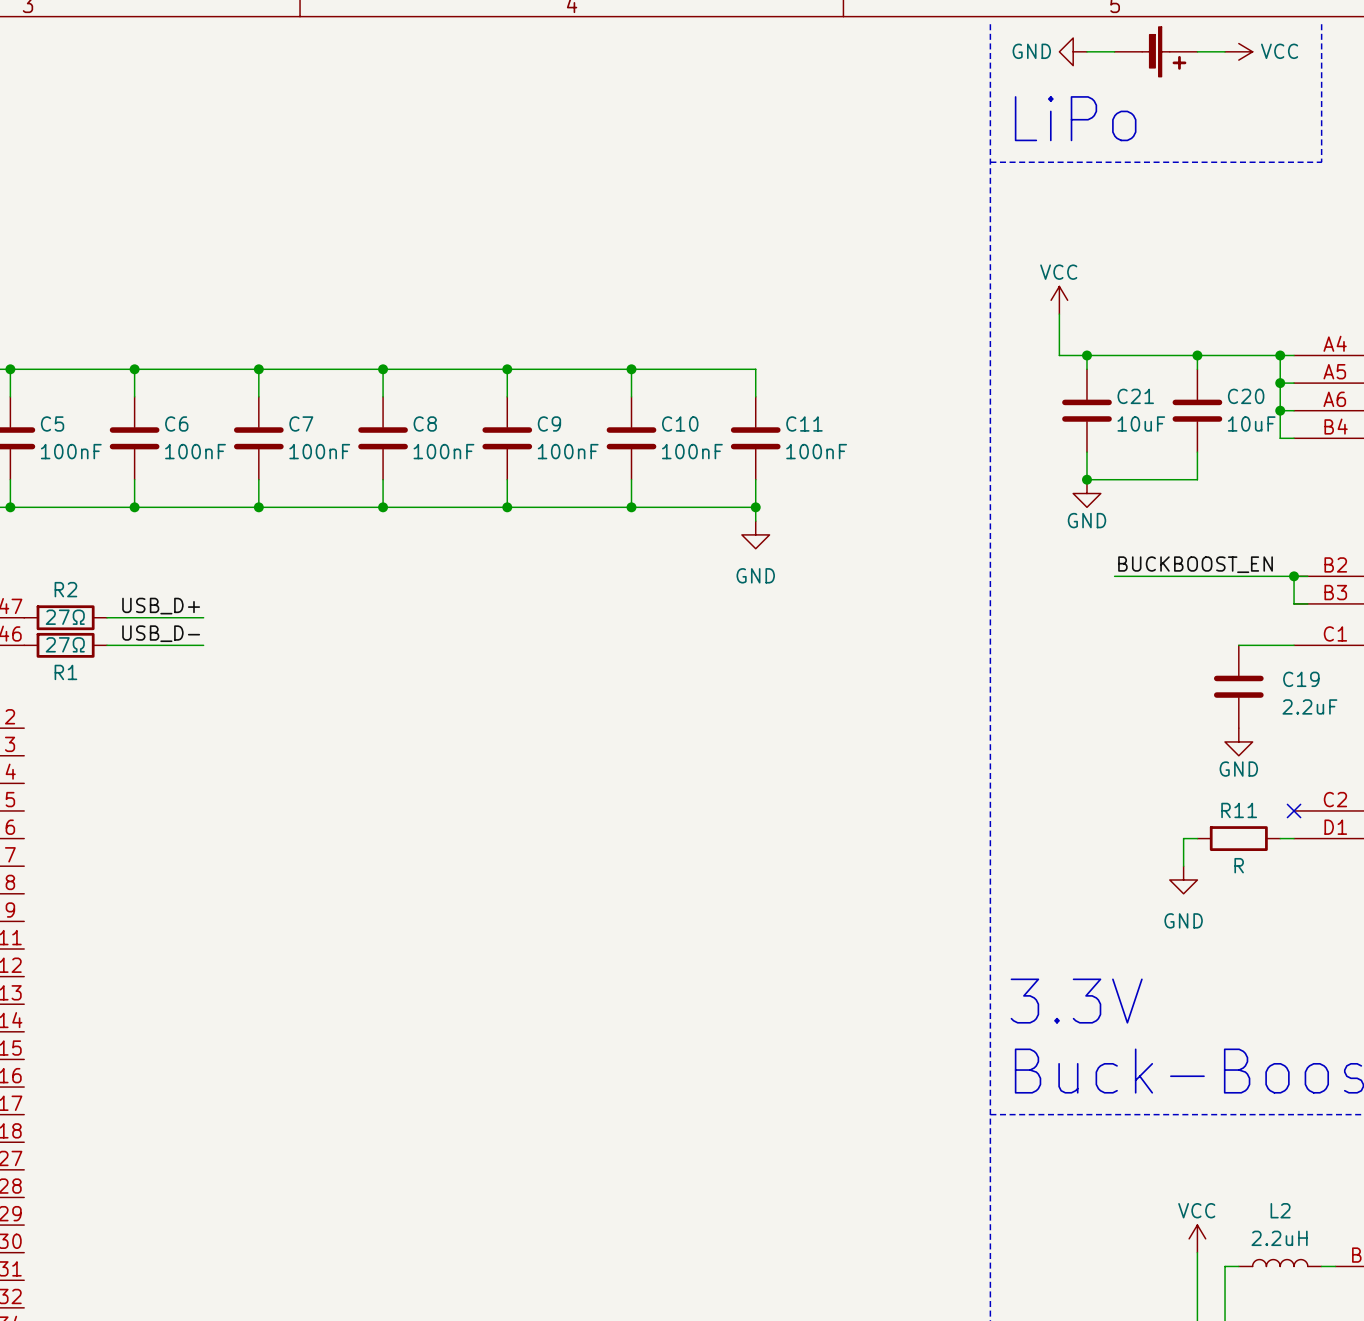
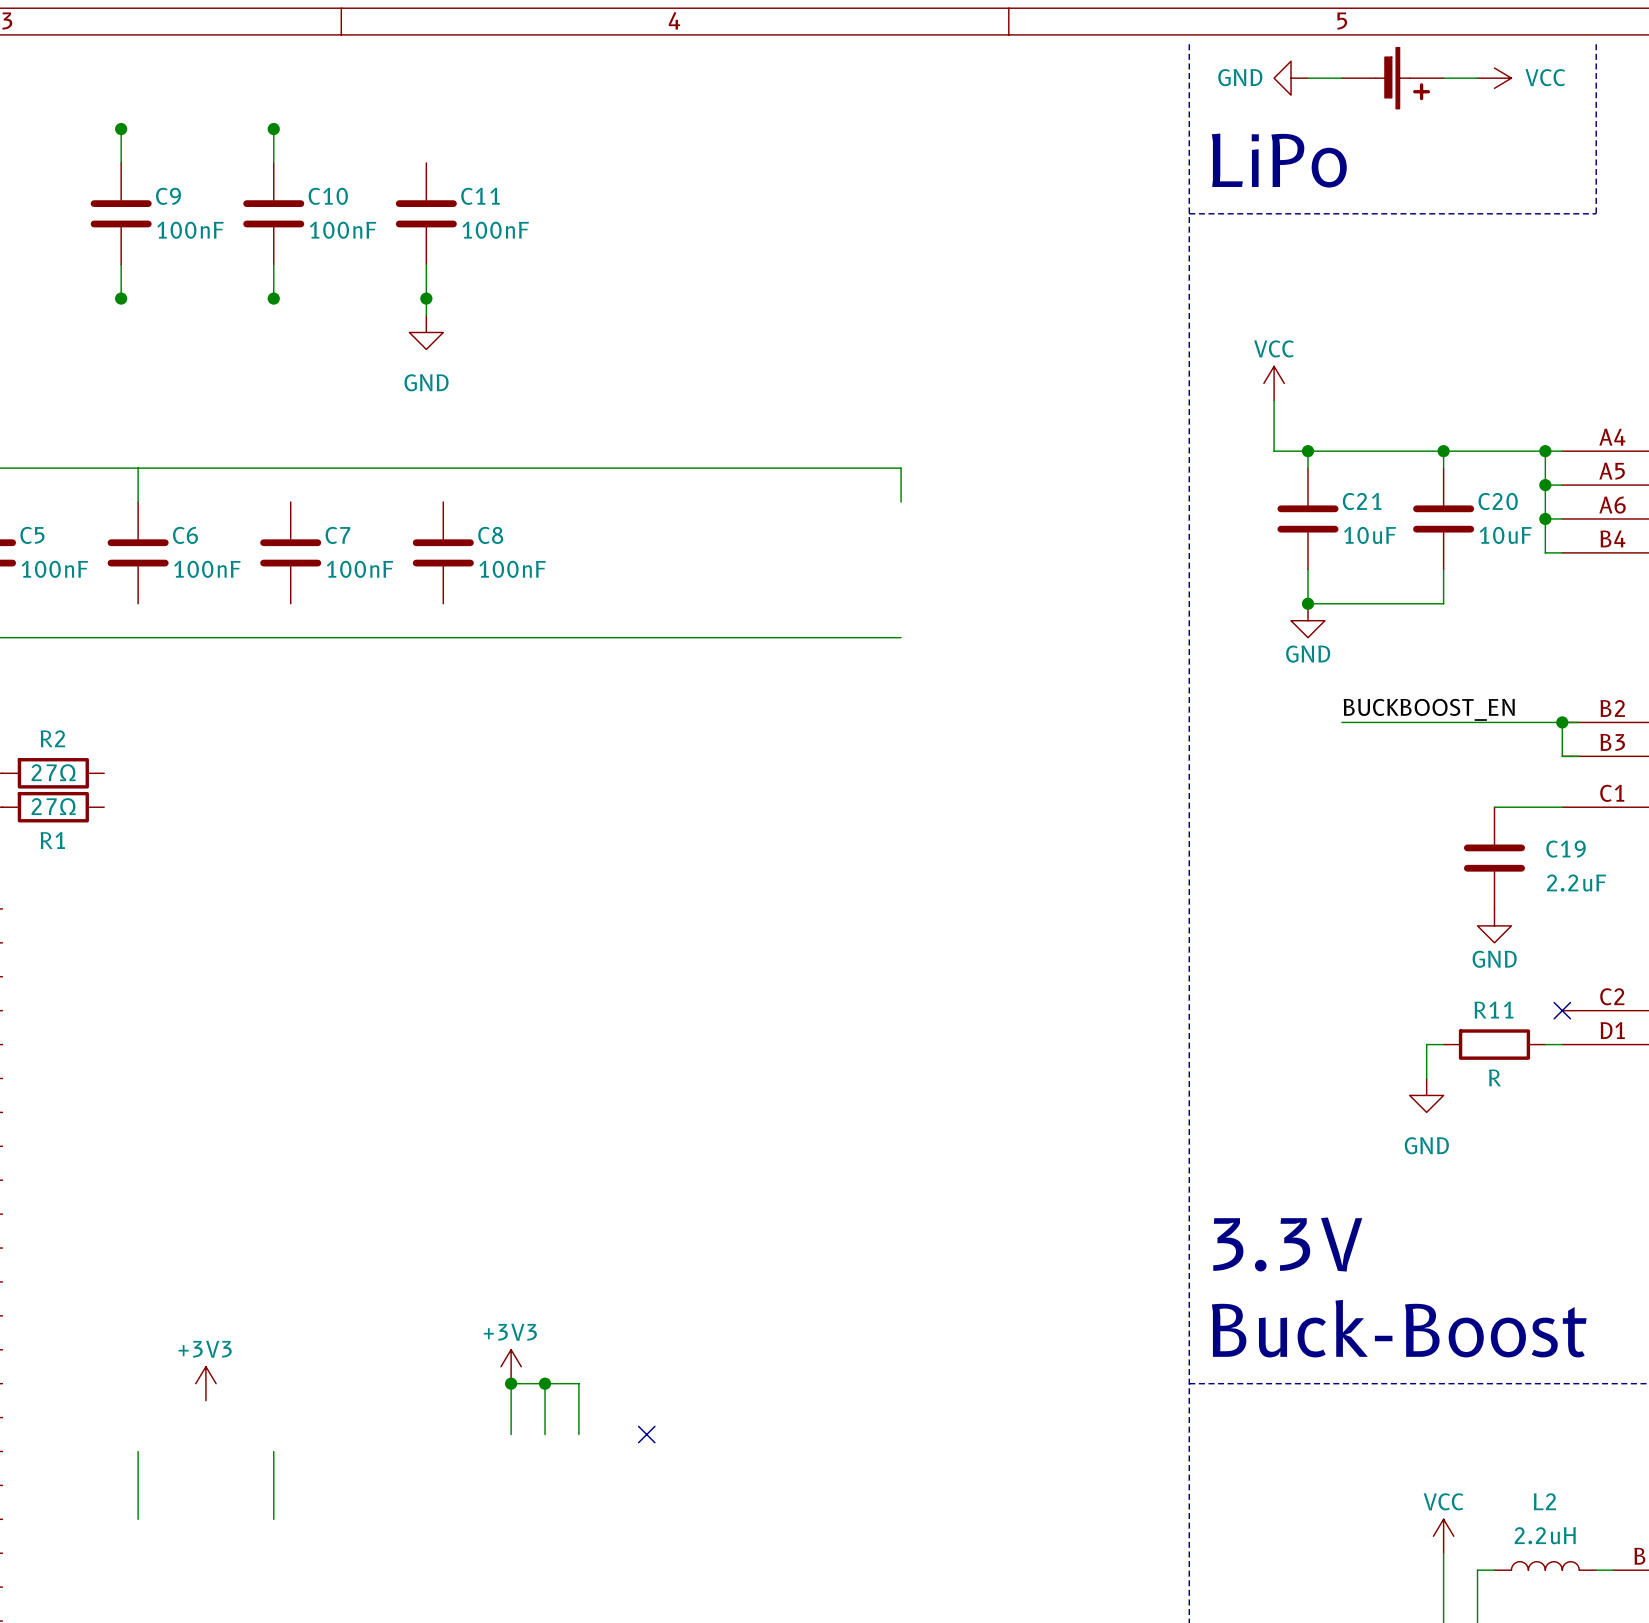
wire: none -> (121, 129) (121, 162)
junction: none -> (121, 129)
wire: none -> (273, 129) (273, 162)
junction: none -> (273, 129)
wire: none -> (426, 264) (426, 315)
junction: none -> (121, 298)
junction: none -> (273, 298)
junction: none -> (426, 298)
power symbol: none -> GND (426, 332)
junction: (134, 369) -> none
wire: (258, 369) (258, 396) -> (121, 264) (121, 298)
junction: (258, 369) -> none
wire: (383, 369) (383, 396) -> (273, 264) (273, 298)
junction: (383, 369) -> none
wire: (507, 369) (507, 396) -> none
junction: (507, 369) -> none
wire: (631, 369) (631, 396) -> none
junction: (631, 369) -> none
C9 position: (507, 438) -> (121, 213)
C10 position: (631, 438) -> (273, 213)
C11 position: (755, 438) -> (426, 213)
wire: (134, 479) (134, 507) -> none
wire: (258, 479) (258, 507) -> none
wire: (383, 479) (383, 507) -> none
wire: (507, 479) (507, 507) -> none
wire: (631, 479) (631, 507) -> none
wire: (755, 479) (755, 521) -> none
junction: (134, 507) -> none
junction: (258, 507) -> none
junction: (383, 507) -> none
junction: (507, 507) -> none
junction: (631, 507) -> none
junction: (755, 507) -> none
power symbol: GND (755, 534) -> none
label: USB_D+ (161, 606) -> none
wire: (107, 617) (203, 617) -> none
label: USB_D- (161, 633) -> none
wire: (107, 645) (203, 645) -> none
power symbol: none -> +3V3 (511, 1366)
power symbol: none -> +3V3 (205, 1383)
junction: none -> (511, 1383)
wire: none -> (545, 1383) (545, 1434)
junction: none -> (545, 1383)
wire: none -> (511, 1434) (511, 1383) (578, 1383) (578, 1434)
no-connect mark: none -> (646, 1434)
wire: none -> (138, 1451) (138, 1519)
wire: none -> (273, 1451) (273, 1519)

